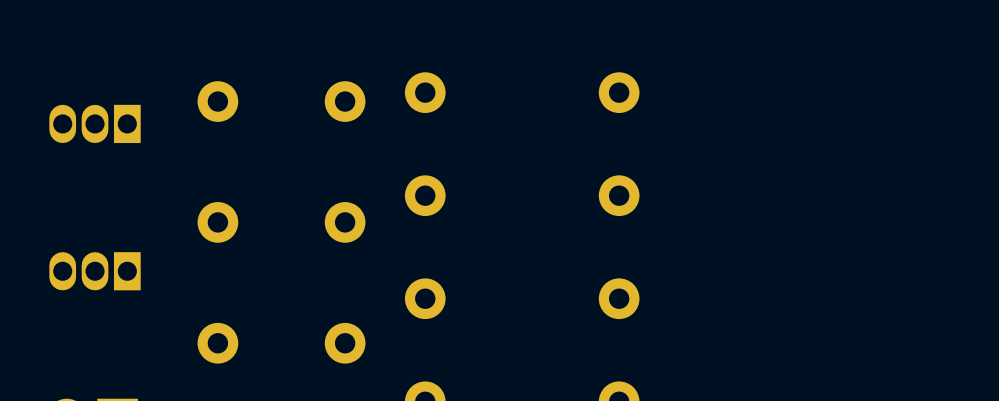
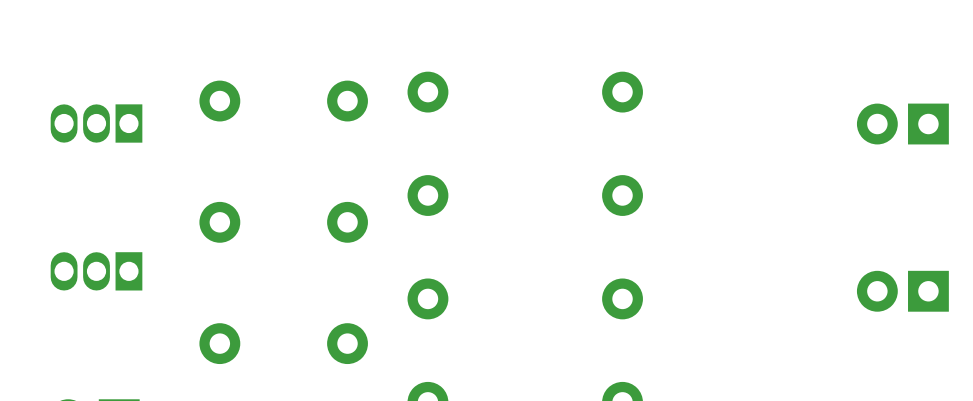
part: none -> (902, 124)
part: none -> (902, 291)

